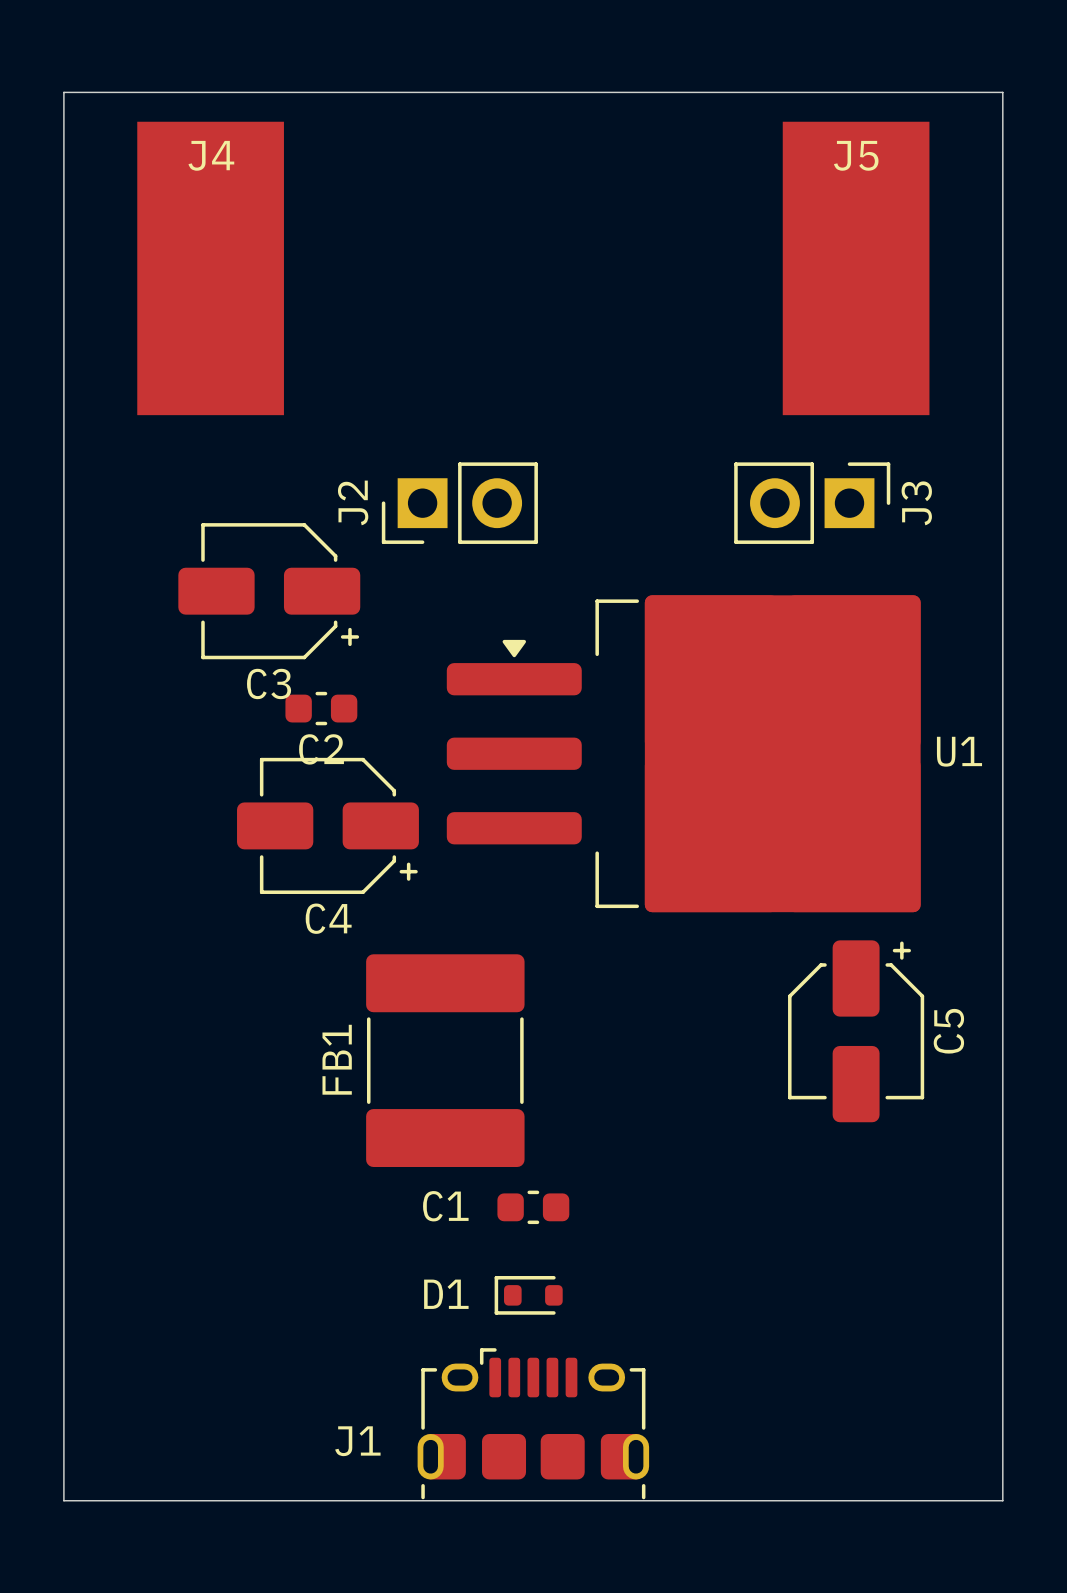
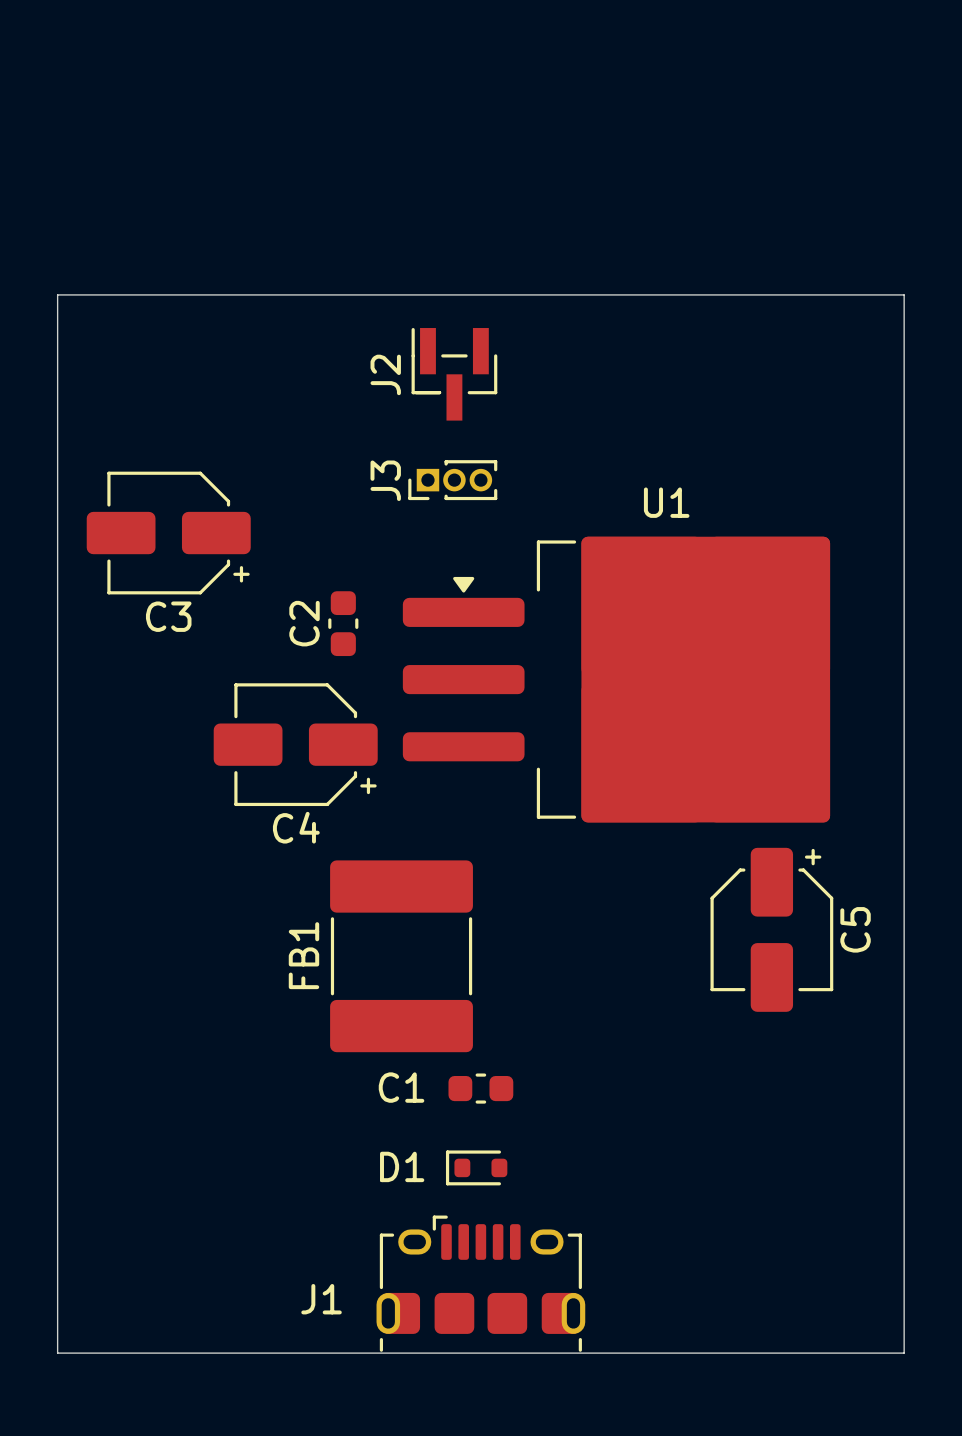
J4: (210, 268) -> none
J5: (856, 268) -> none
board edge: (63, 327) (63, 92) (1002, 92) (1002, 327) -> (57, 294) (904, 294)
J2 footprint: [381, 462, 538, 544] -> [411, 328, 498, 421]
J3 footprint: [734, 462, 891, 544] -> [408, 460, 498, 501]
J3 name position: J3 (916, 503) -> J3 (385, 480)
C3 position: (269, 591) -> (168, 533)
C2 rotation: 0° (321, 708) -> 90° clockwise (343, 623)
C2 position: (321, 708) -> (343, 623)
U1 name position: U1 (959, 751) -> U1 (666, 502)

